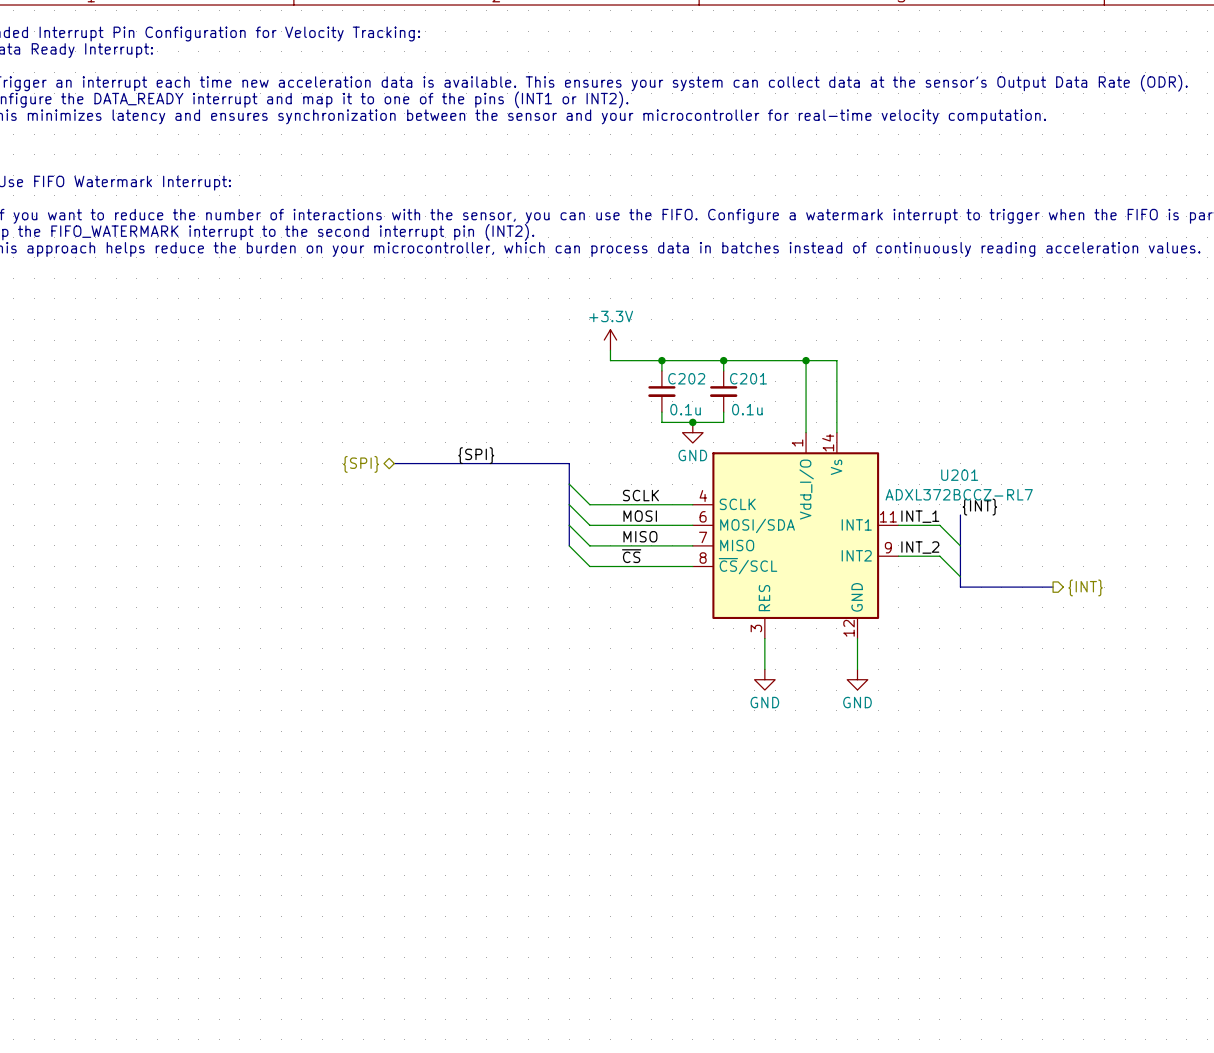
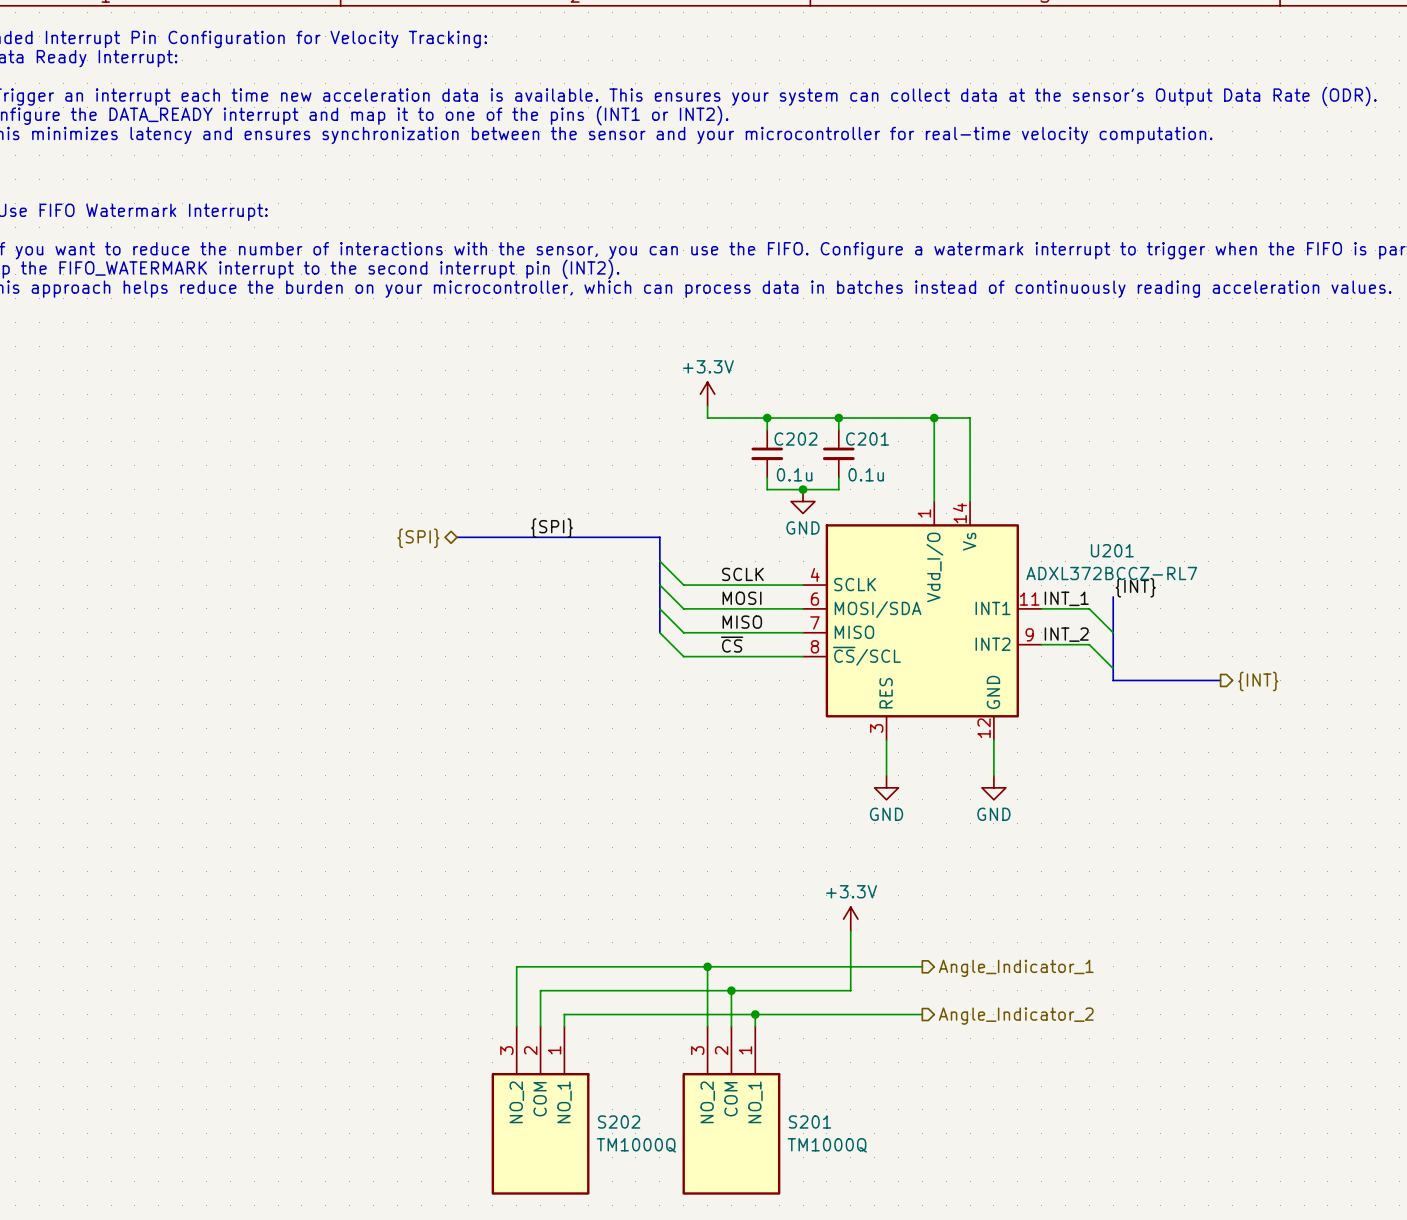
power symbol: none -> +3.3V (850, 919)
wire: none -> (850, 931) (850, 990) (540, 990) (540, 1026)
wire: none -> (707, 966) (707, 1026)
junction: none -> (707, 966)
wire: none -> (922, 966) (516, 966) (516, 1026)
hierarchical label: none -> Angle_Indicator_1 (1016, 968)
wire: none -> (731, 990) (731, 1026)
junction: none -> (731, 990)
wire: none -> (755, 1014) (755, 1026)
junction: none -> (755, 1014)
wire: none -> (922, 1014) (564, 1014) (564, 1026)
hierarchical label: none -> Angle_Indicator_2 (1016, 1016)
S202: none -> TM1000Q (540, 1110)
S201: none -> TM1000Q (731, 1110)

